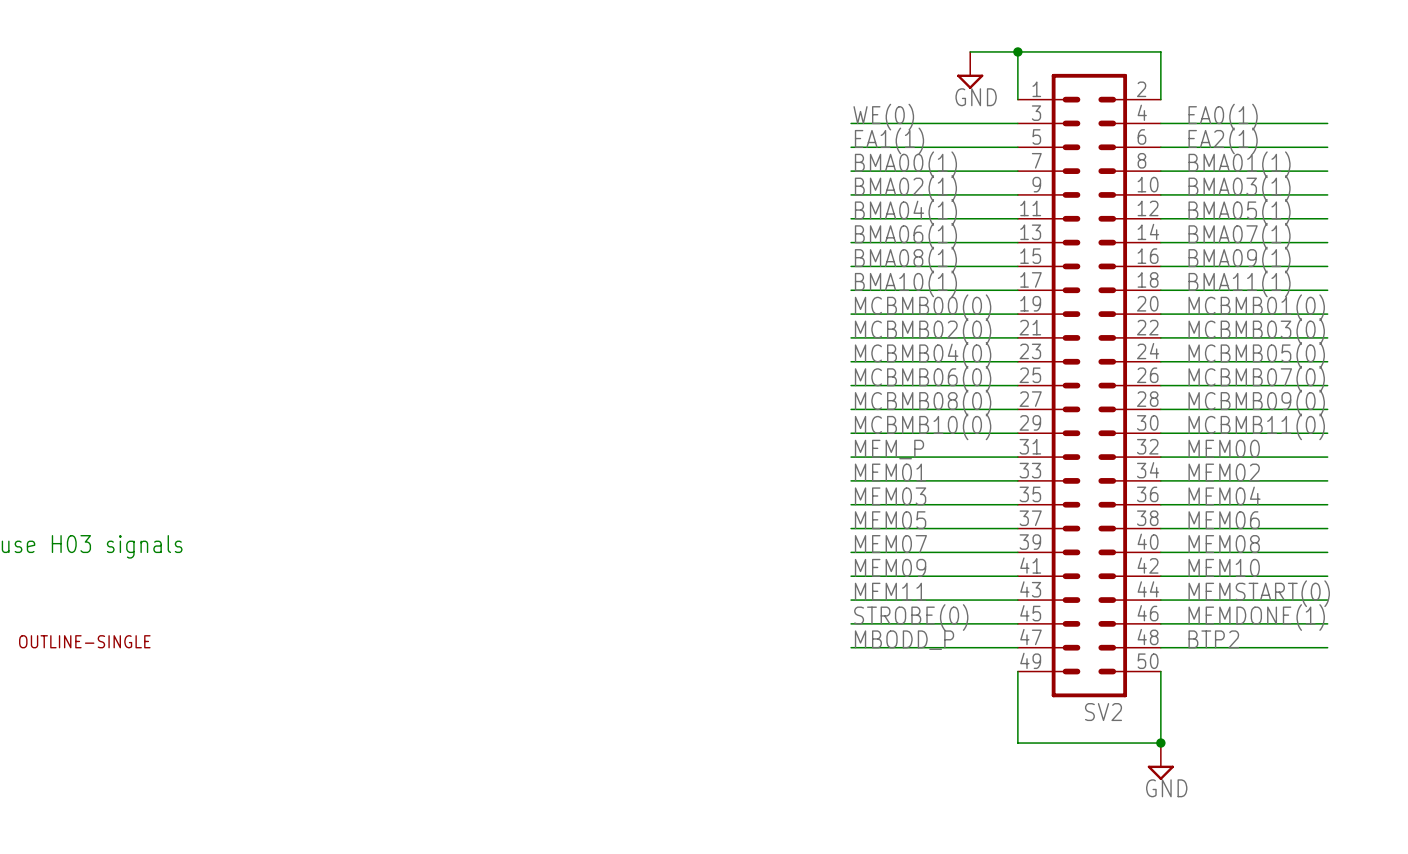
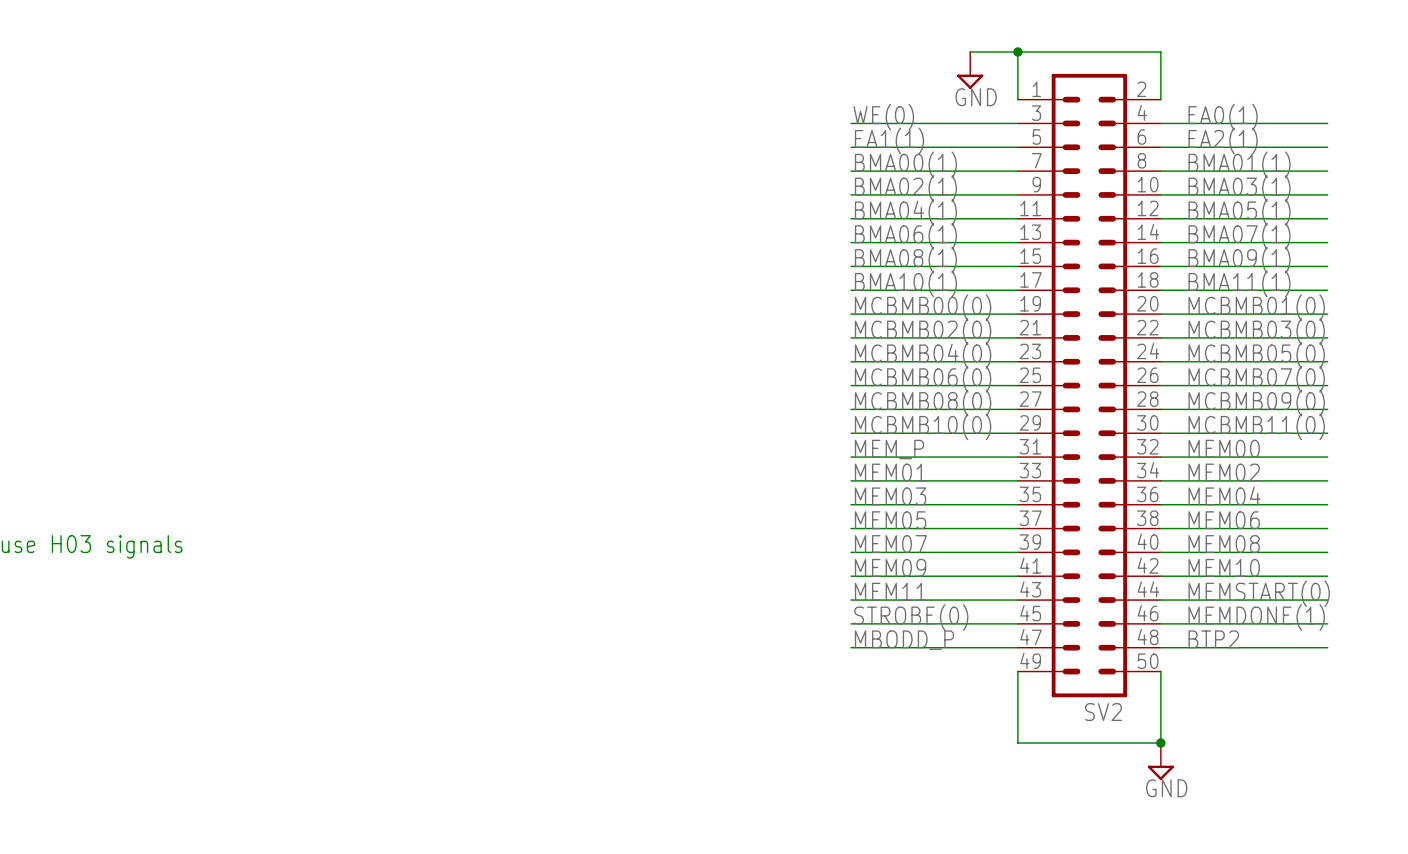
part: OUTLINE-SINGLE (84, 641) -> none

